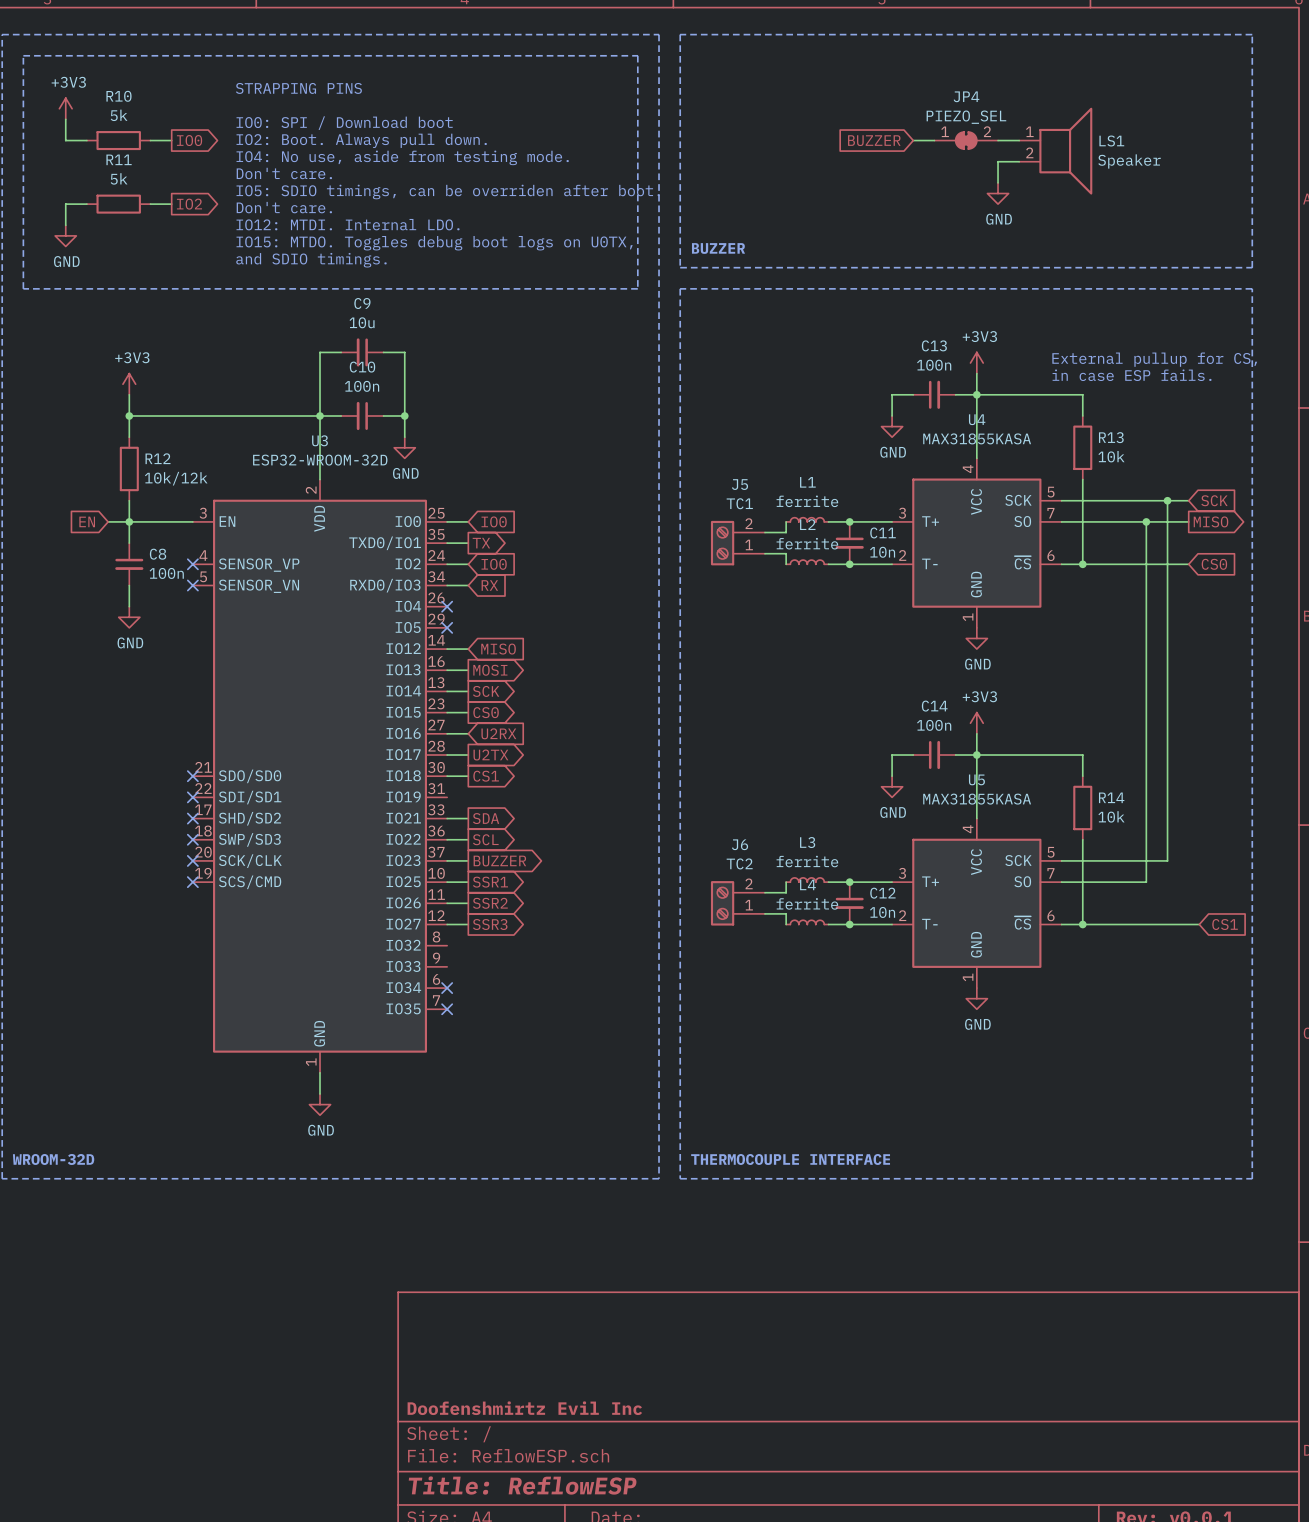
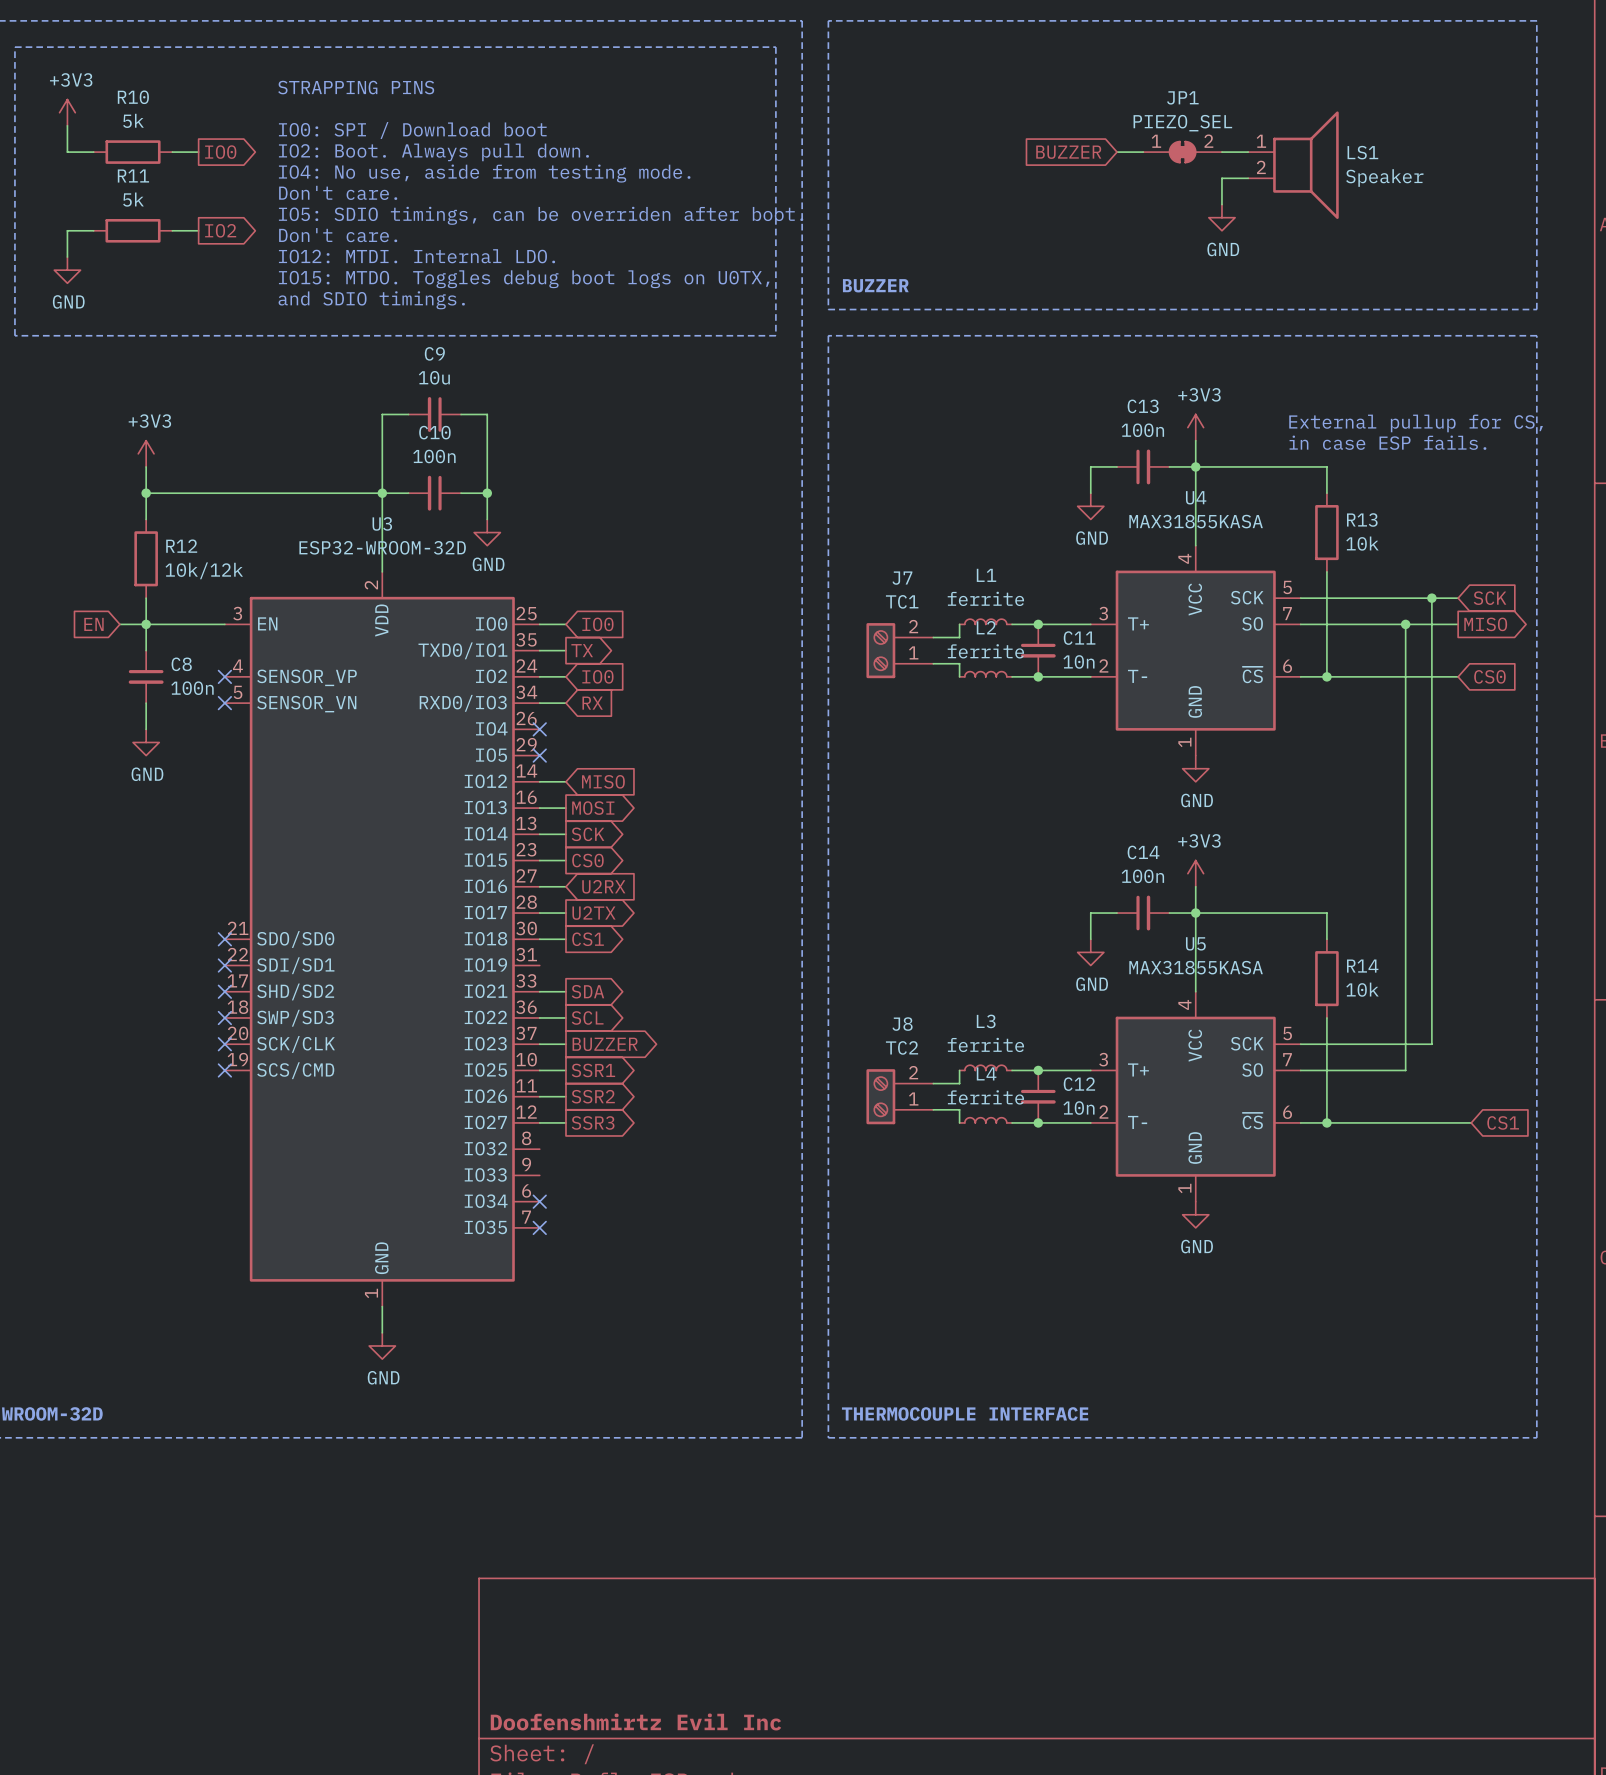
JP4 name: JP4 (966, 96) -> JP1 (1182, 97)
J5 name: J5 (740, 484) -> J7 (902, 578)
J6 name: J6 (740, 844) -> J8 (902, 1024)

